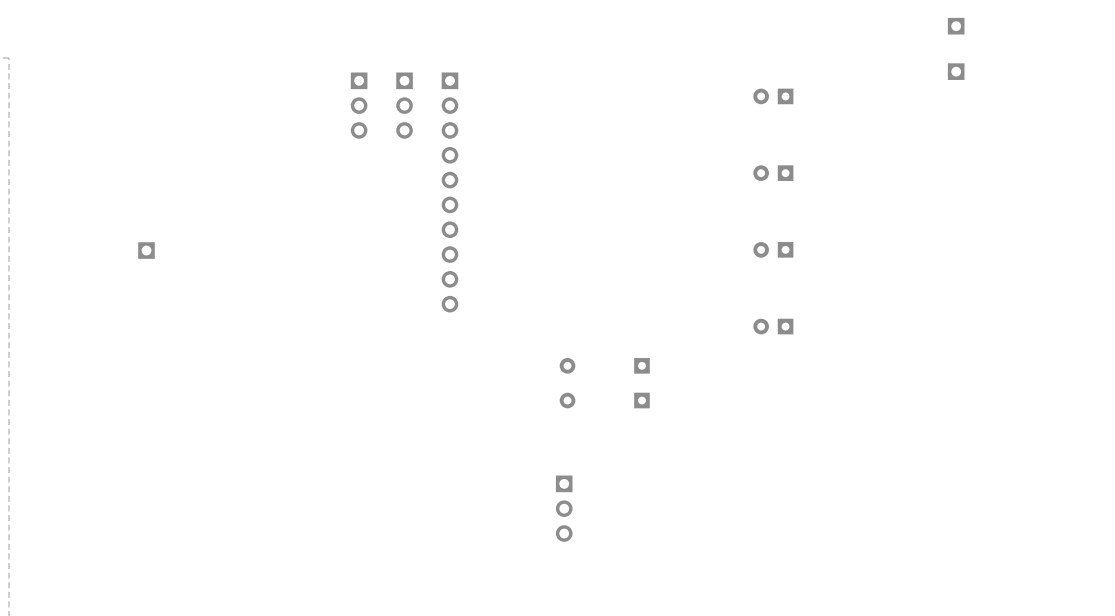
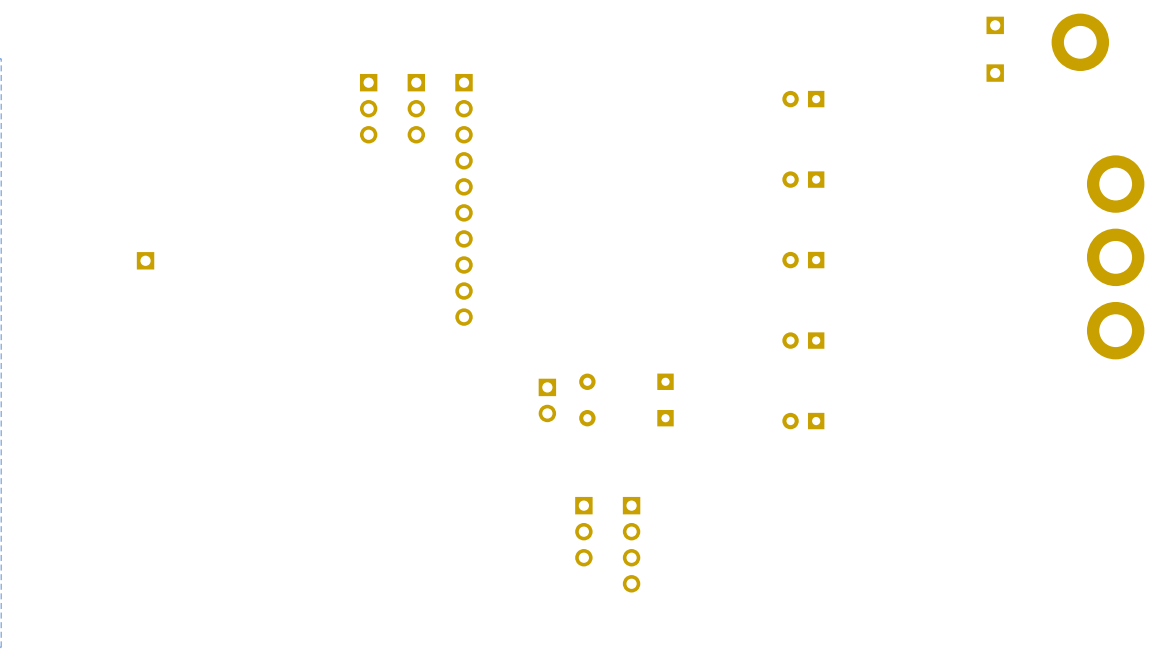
part: none -> (1080, 42)
part: none -> (1115, 184)
part: none -> (1115, 257)
part: none -> (1115, 330)
part: none -> (547, 400)
part: none -> (803, 421)
part: none -> (631, 544)

